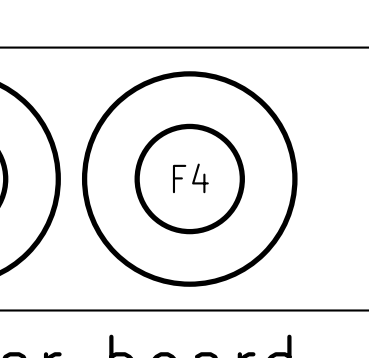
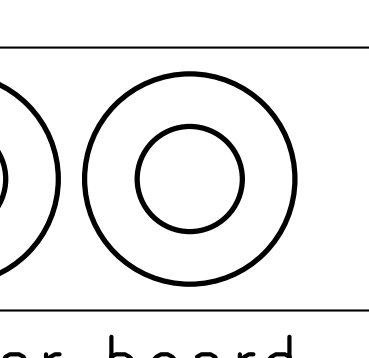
F4 name: F4 (190, 178) -> none

